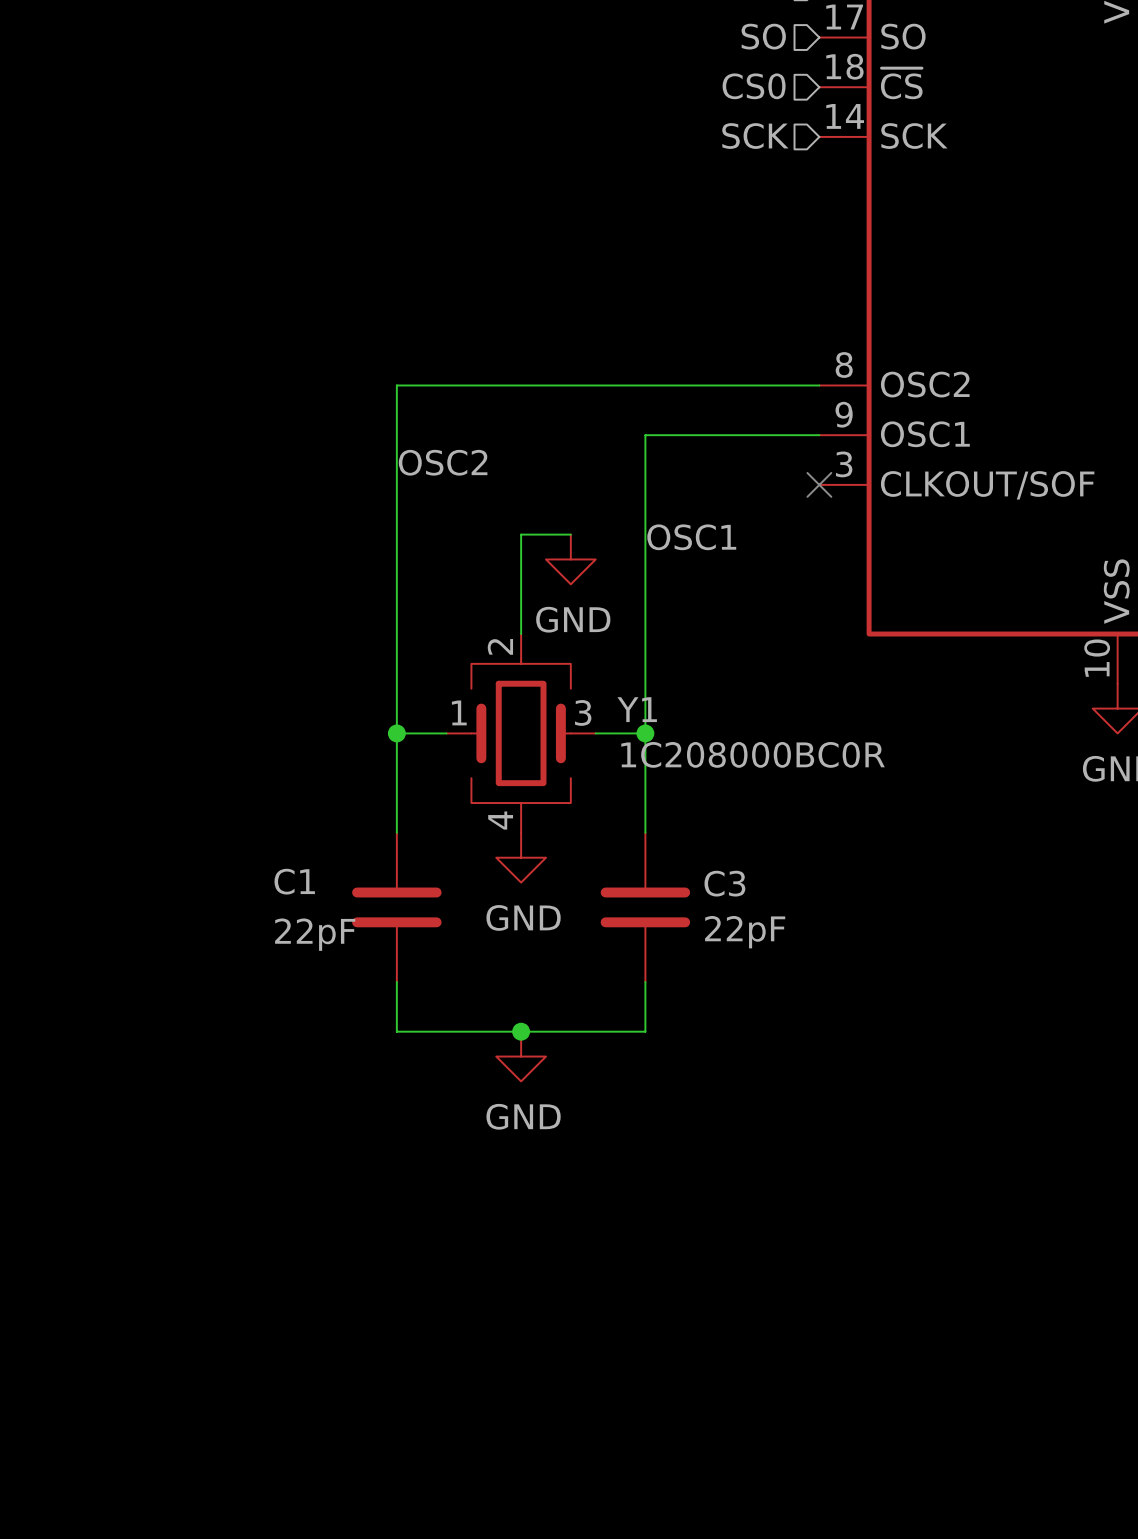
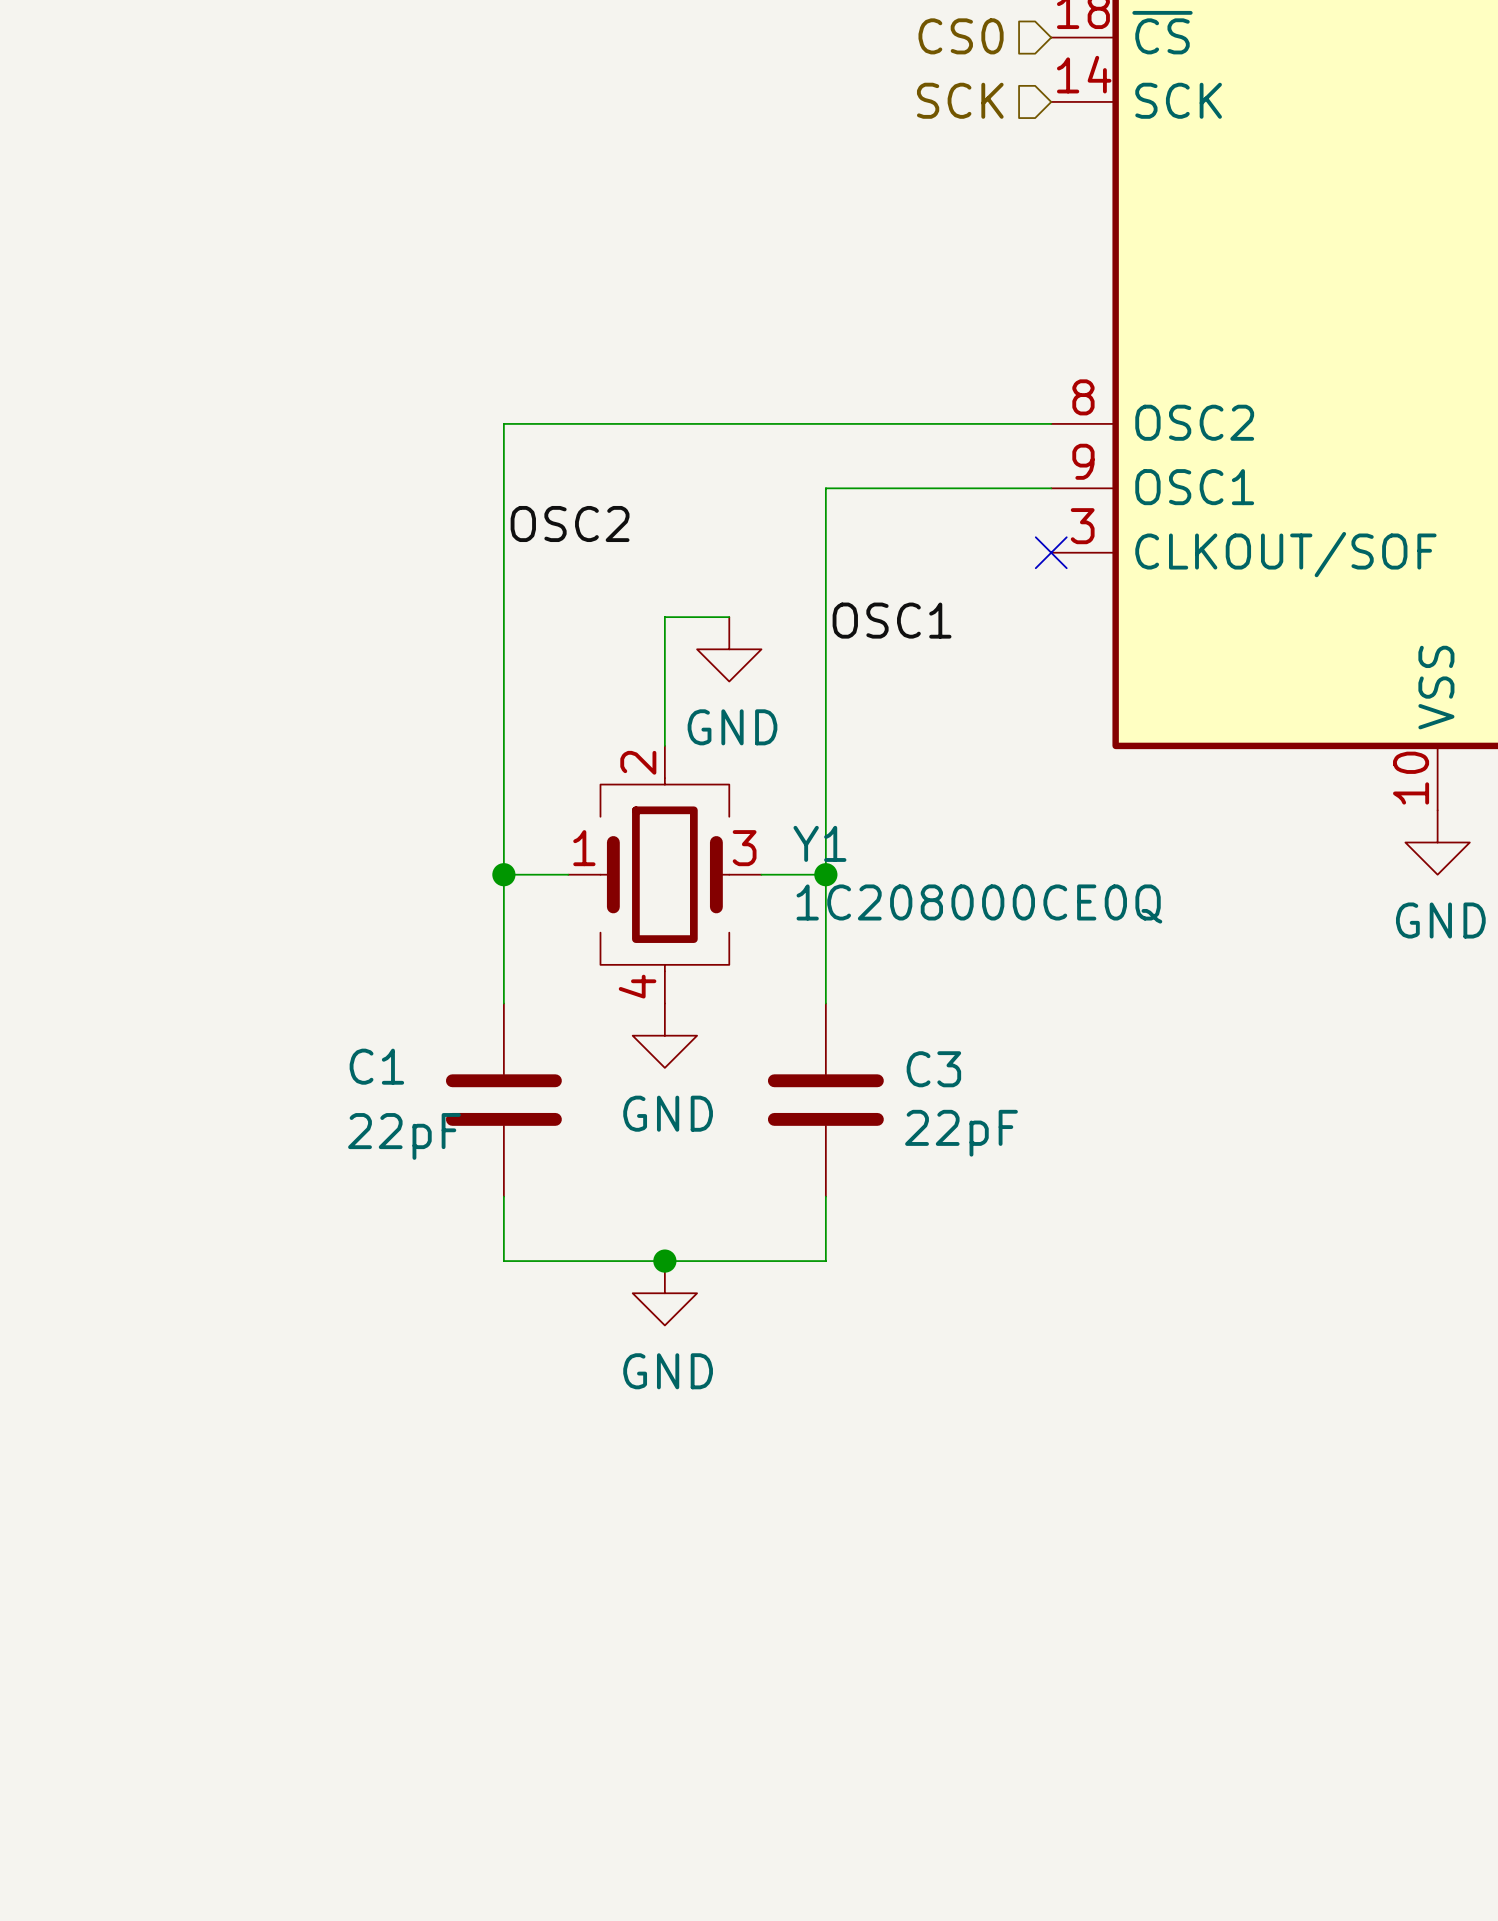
Y1 value: 1C208000BC0R (753, 754) -> 1C208000CE0Q (979, 904)

